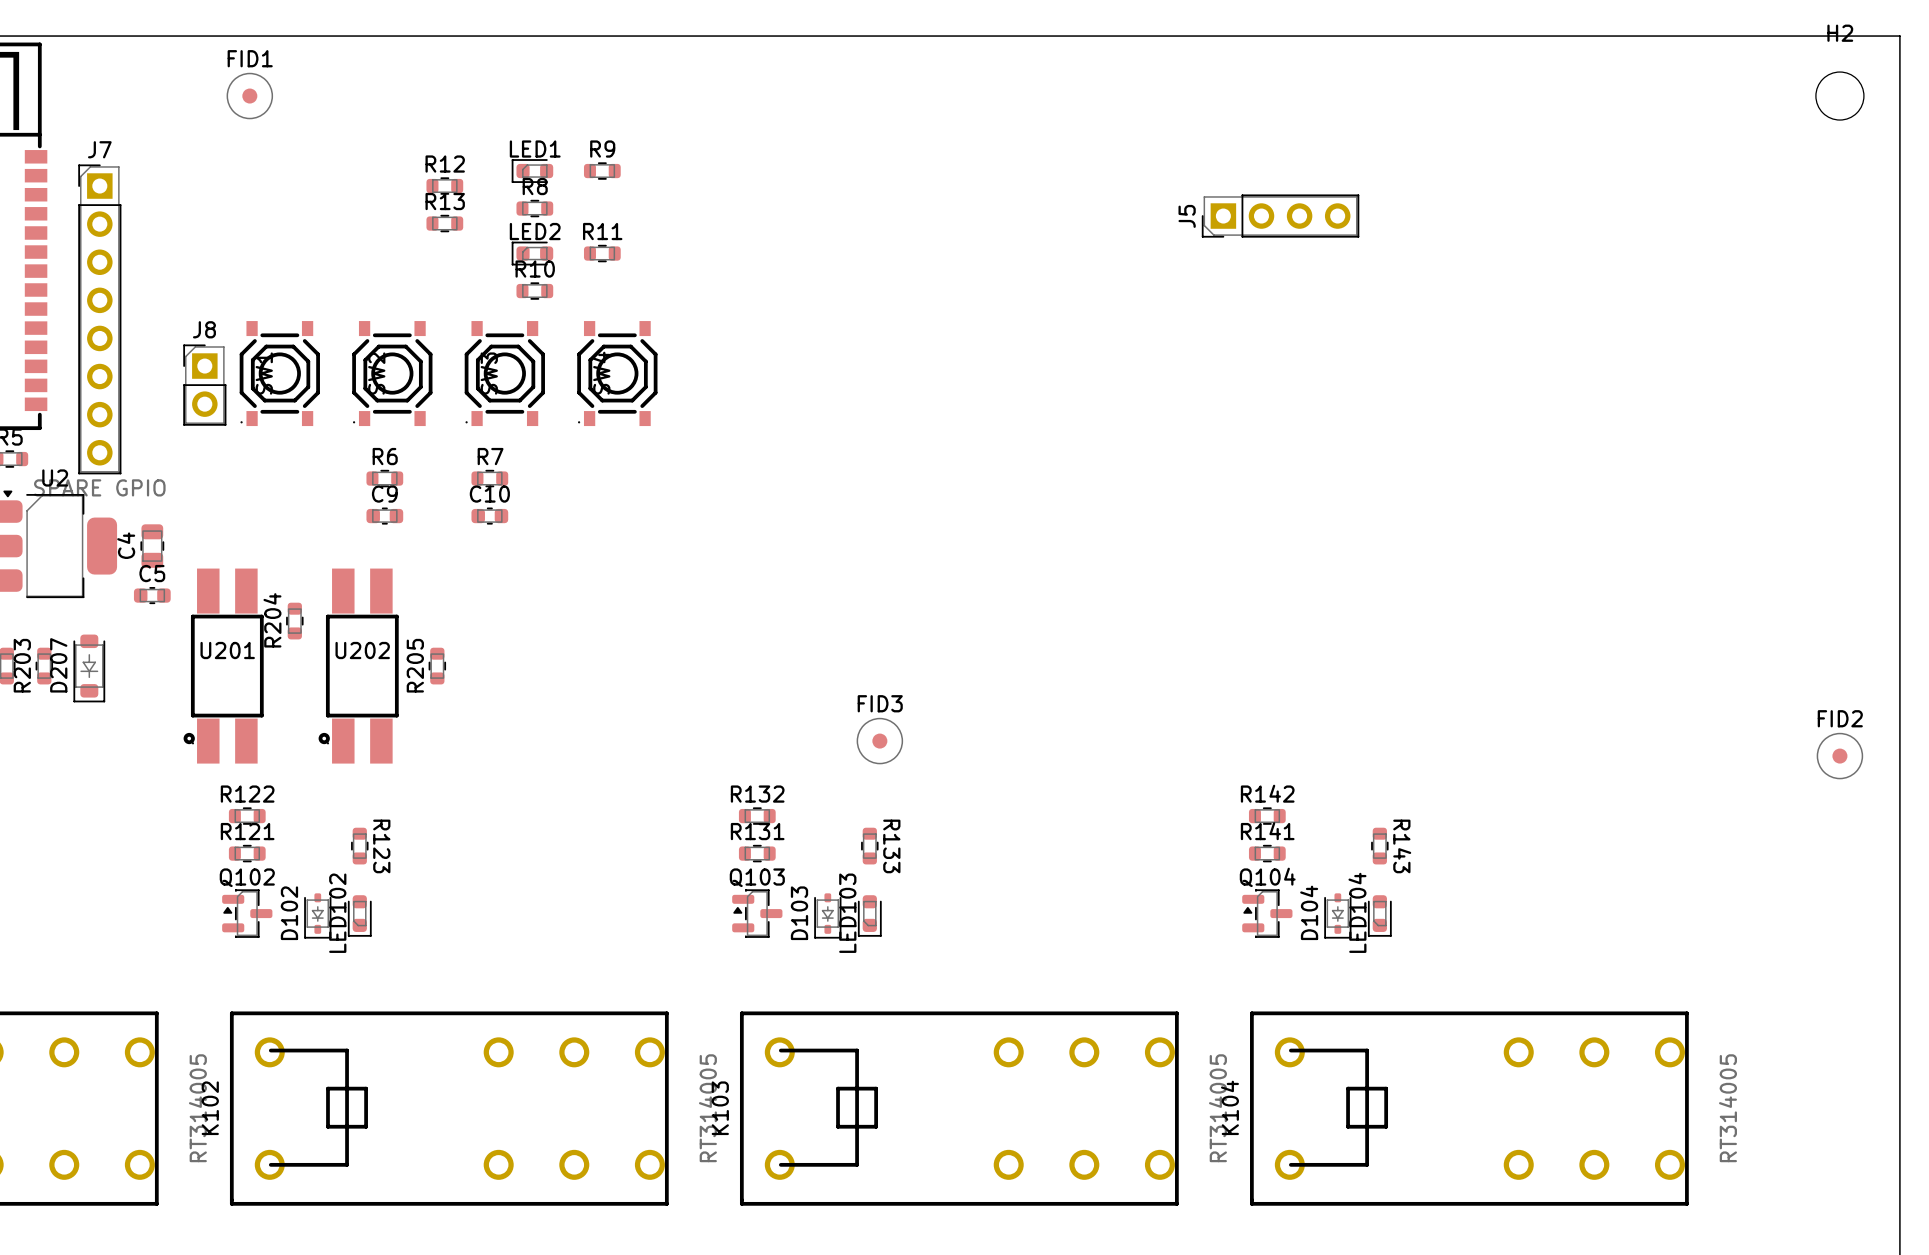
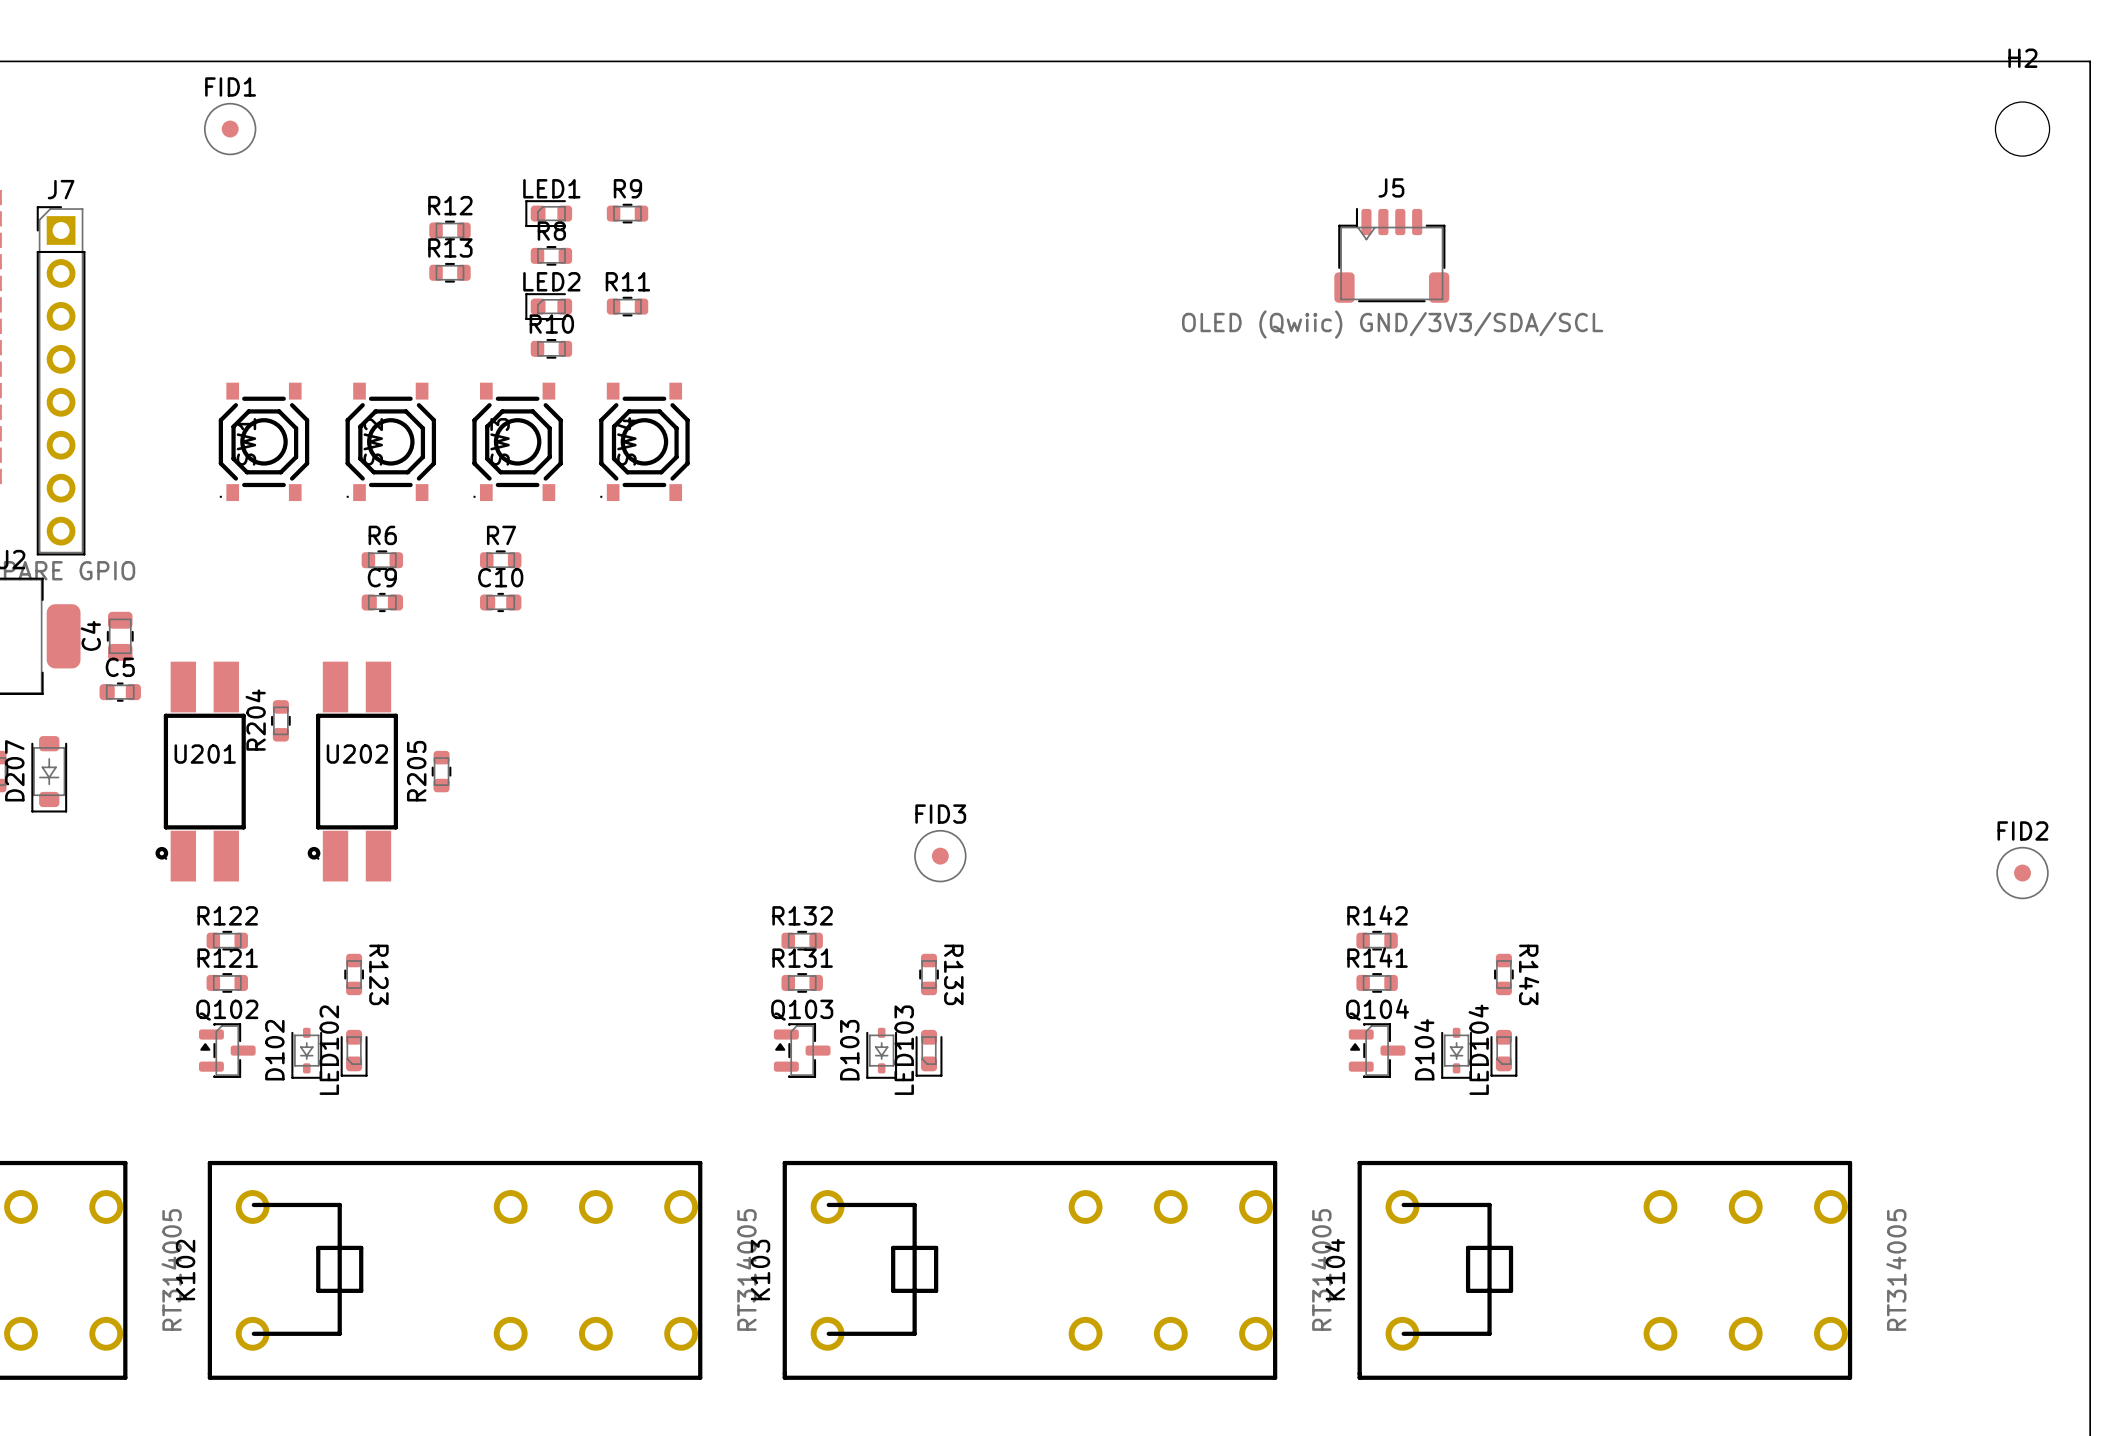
J5 footprint: [1201, 194, 1360, 238] -> [1334, 207, 1450, 303]
J5 name position: J5 (1187, 216) -> J5 (1391, 187)
J5 value: none -> OLED (Qwiic) GND/3V3/SDA/SCL (1392, 324)
J8: (204, 385) -> none

